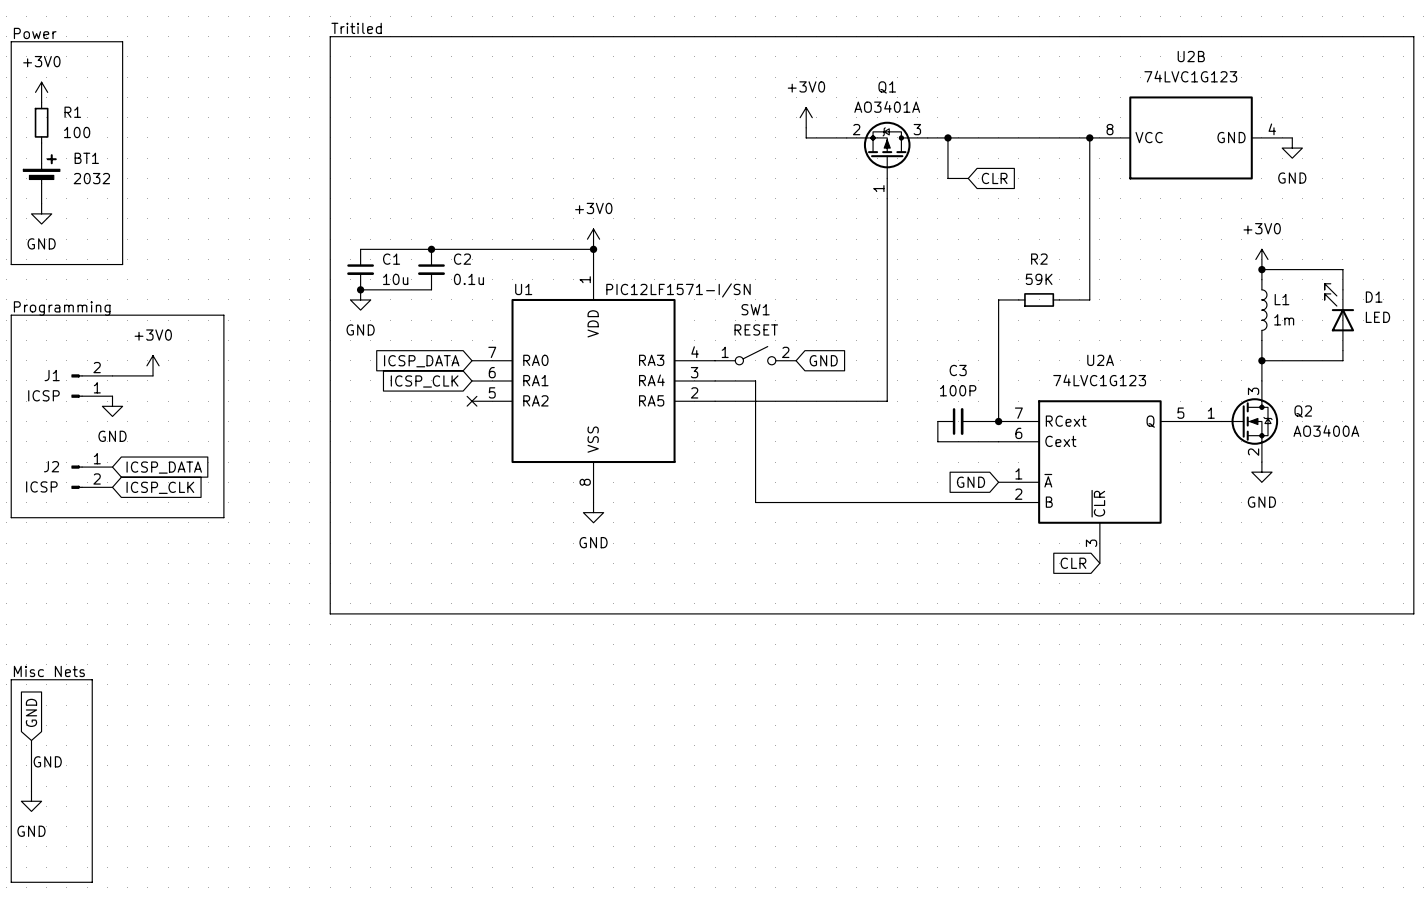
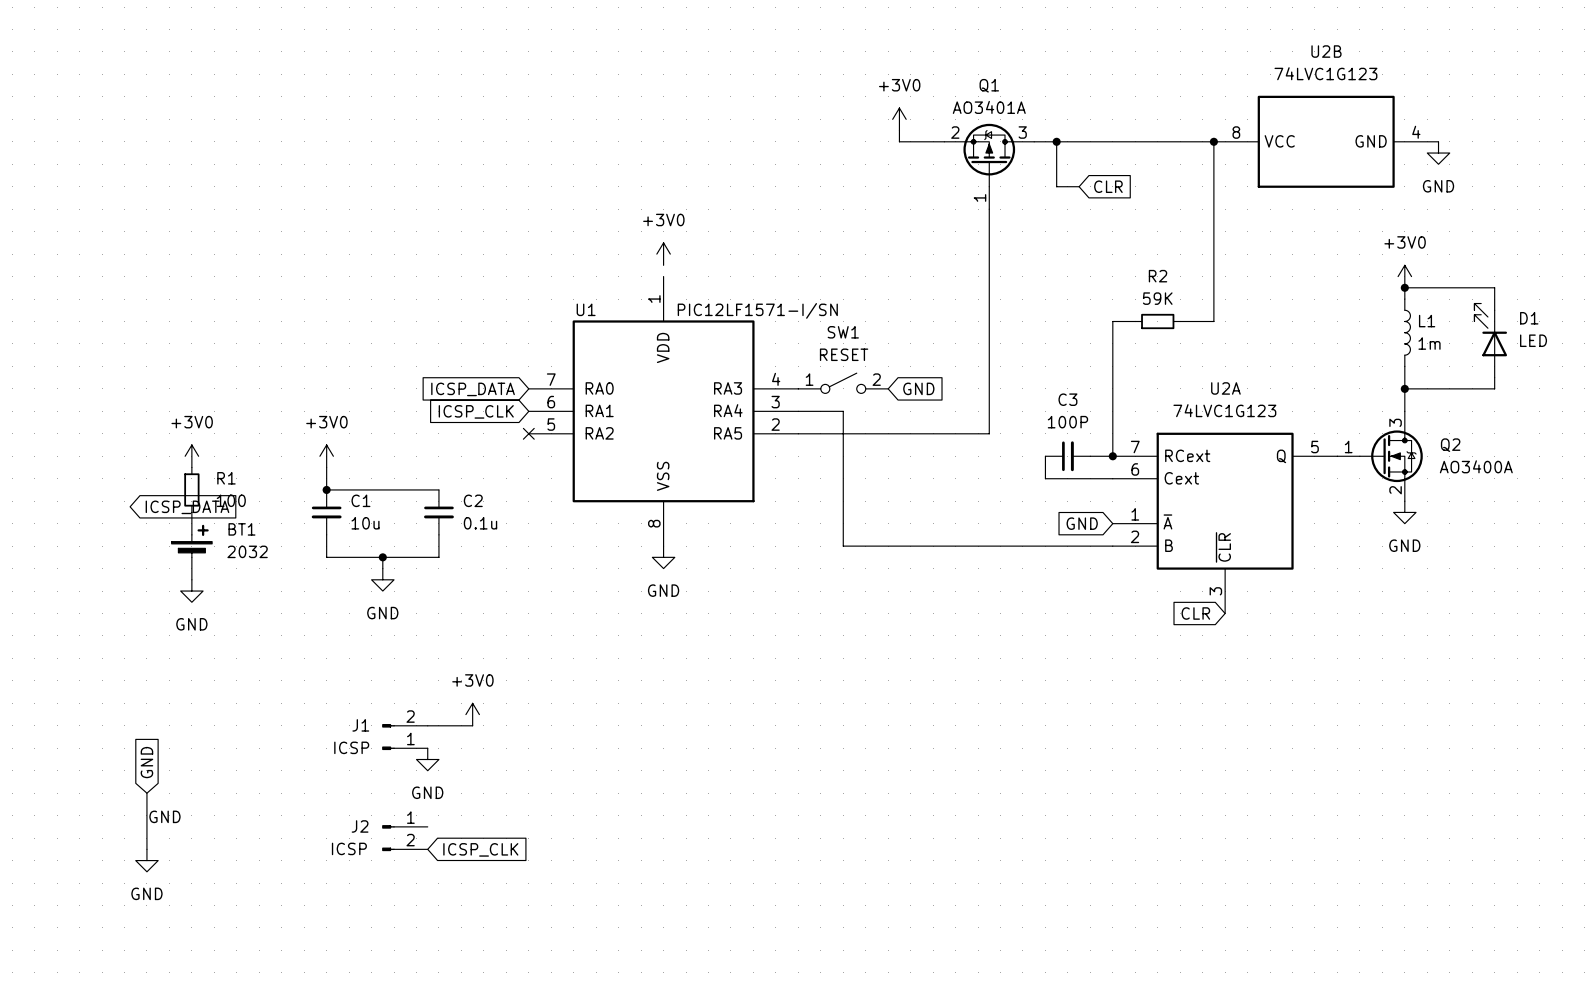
text: Tritiled (356, 28) -> none
text: Power (35, 33) -> none
line: (330, 36) (1413, 36) (1413, 613) (330, 613) (330, 36) -> none
line: (11, 41) (122, 41) (122, 264) (11, 264) (11, 41) -> none
power symbol: +3V0 (41, 92) -> none
R1 position: (41, 122) -> (191, 489)
BT1 position: (41, 173) -> (191, 546)
power symbol: GND (41, 213) -> none
wire: (360, 249) (593, 249) (593, 259) -> none
junction: (431, 249) -> none
junction: (593, 249) -> none
C1 position: (360, 269) -> (326, 512)
C2 position: (431, 269) -> (438, 512)
wire: (360, 289) (431, 289) -> none
junction: (360, 289) -> none
power symbol: GND (360, 299) -> none
text: Programming (62, 308) -> none
line: (11, 315) (11, 517) (223, 517) (223, 315) (11, 315) -> none
power symbol position: +3V0 (153, 365) -> +3V0 (191, 456)
wire: (112, 375) (153, 375) -> none
J1 position: (91, 386) -> (404, 737)
power symbol: GND (112, 406) -> none
power symbol: none -> +3V0 (326, 456)
wire: none -> (326, 467) (326, 489) (438, 489)
junction: none -> (326, 489)
J2 position: (91, 477) -> (404, 838)
global label: ICSP_CLK (160, 487) -> none
wire: none -> (326, 534) (326, 557) (438, 557) (438, 534)
wire: none -> (382, 557) (382, 568)
junction: none -> (382, 557)
power symbol: none -> GND (382, 579)
power symbol: none -> GND (191, 591)
power symbol: none -> +3V0 (472, 714)
wire: none -> (427, 725) (472, 725)
text: Misc Nets (49, 671) -> none
line: (11, 679) (92, 679) (92, 882) (11, 882) (11, 679) -> none
power symbol: none -> GND (427, 759)
global label position: GND (31, 712) -> GND (146, 762)
wire: (31, 740) (31, 791) -> (146, 793) (146, 849)
label position: GND (47, 761) -> GND (164, 816)
global label: none -> ICSP_CLK (480, 849)
power symbol position: GND (31, 801) -> GND (146, 860)

